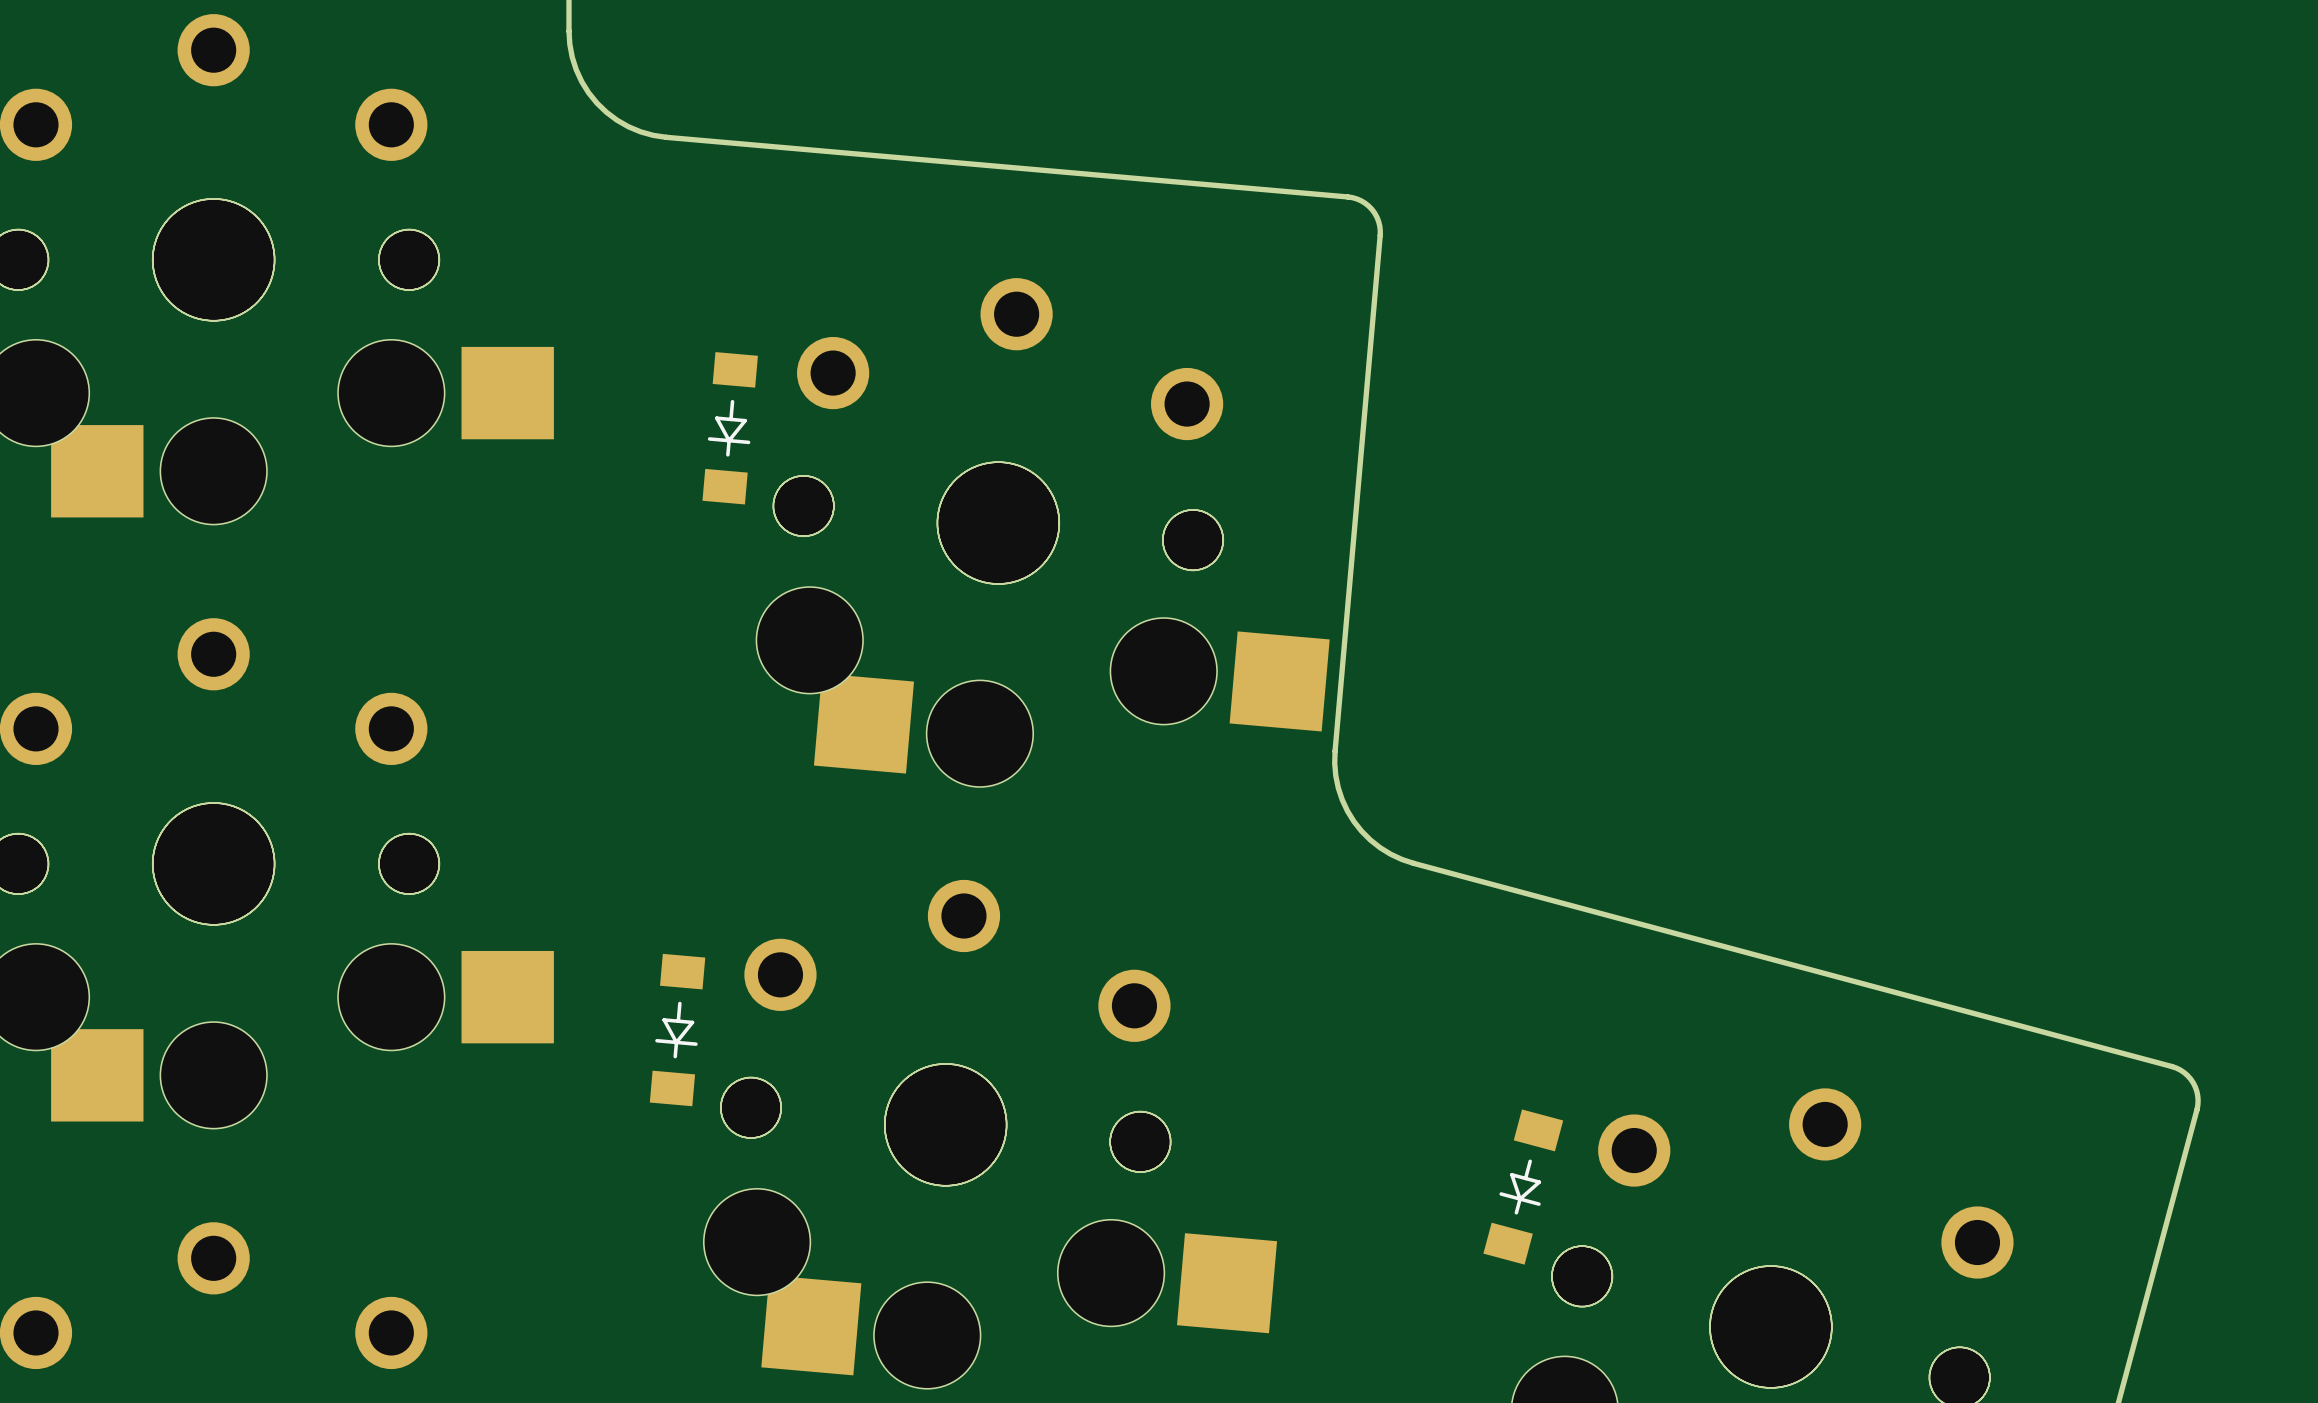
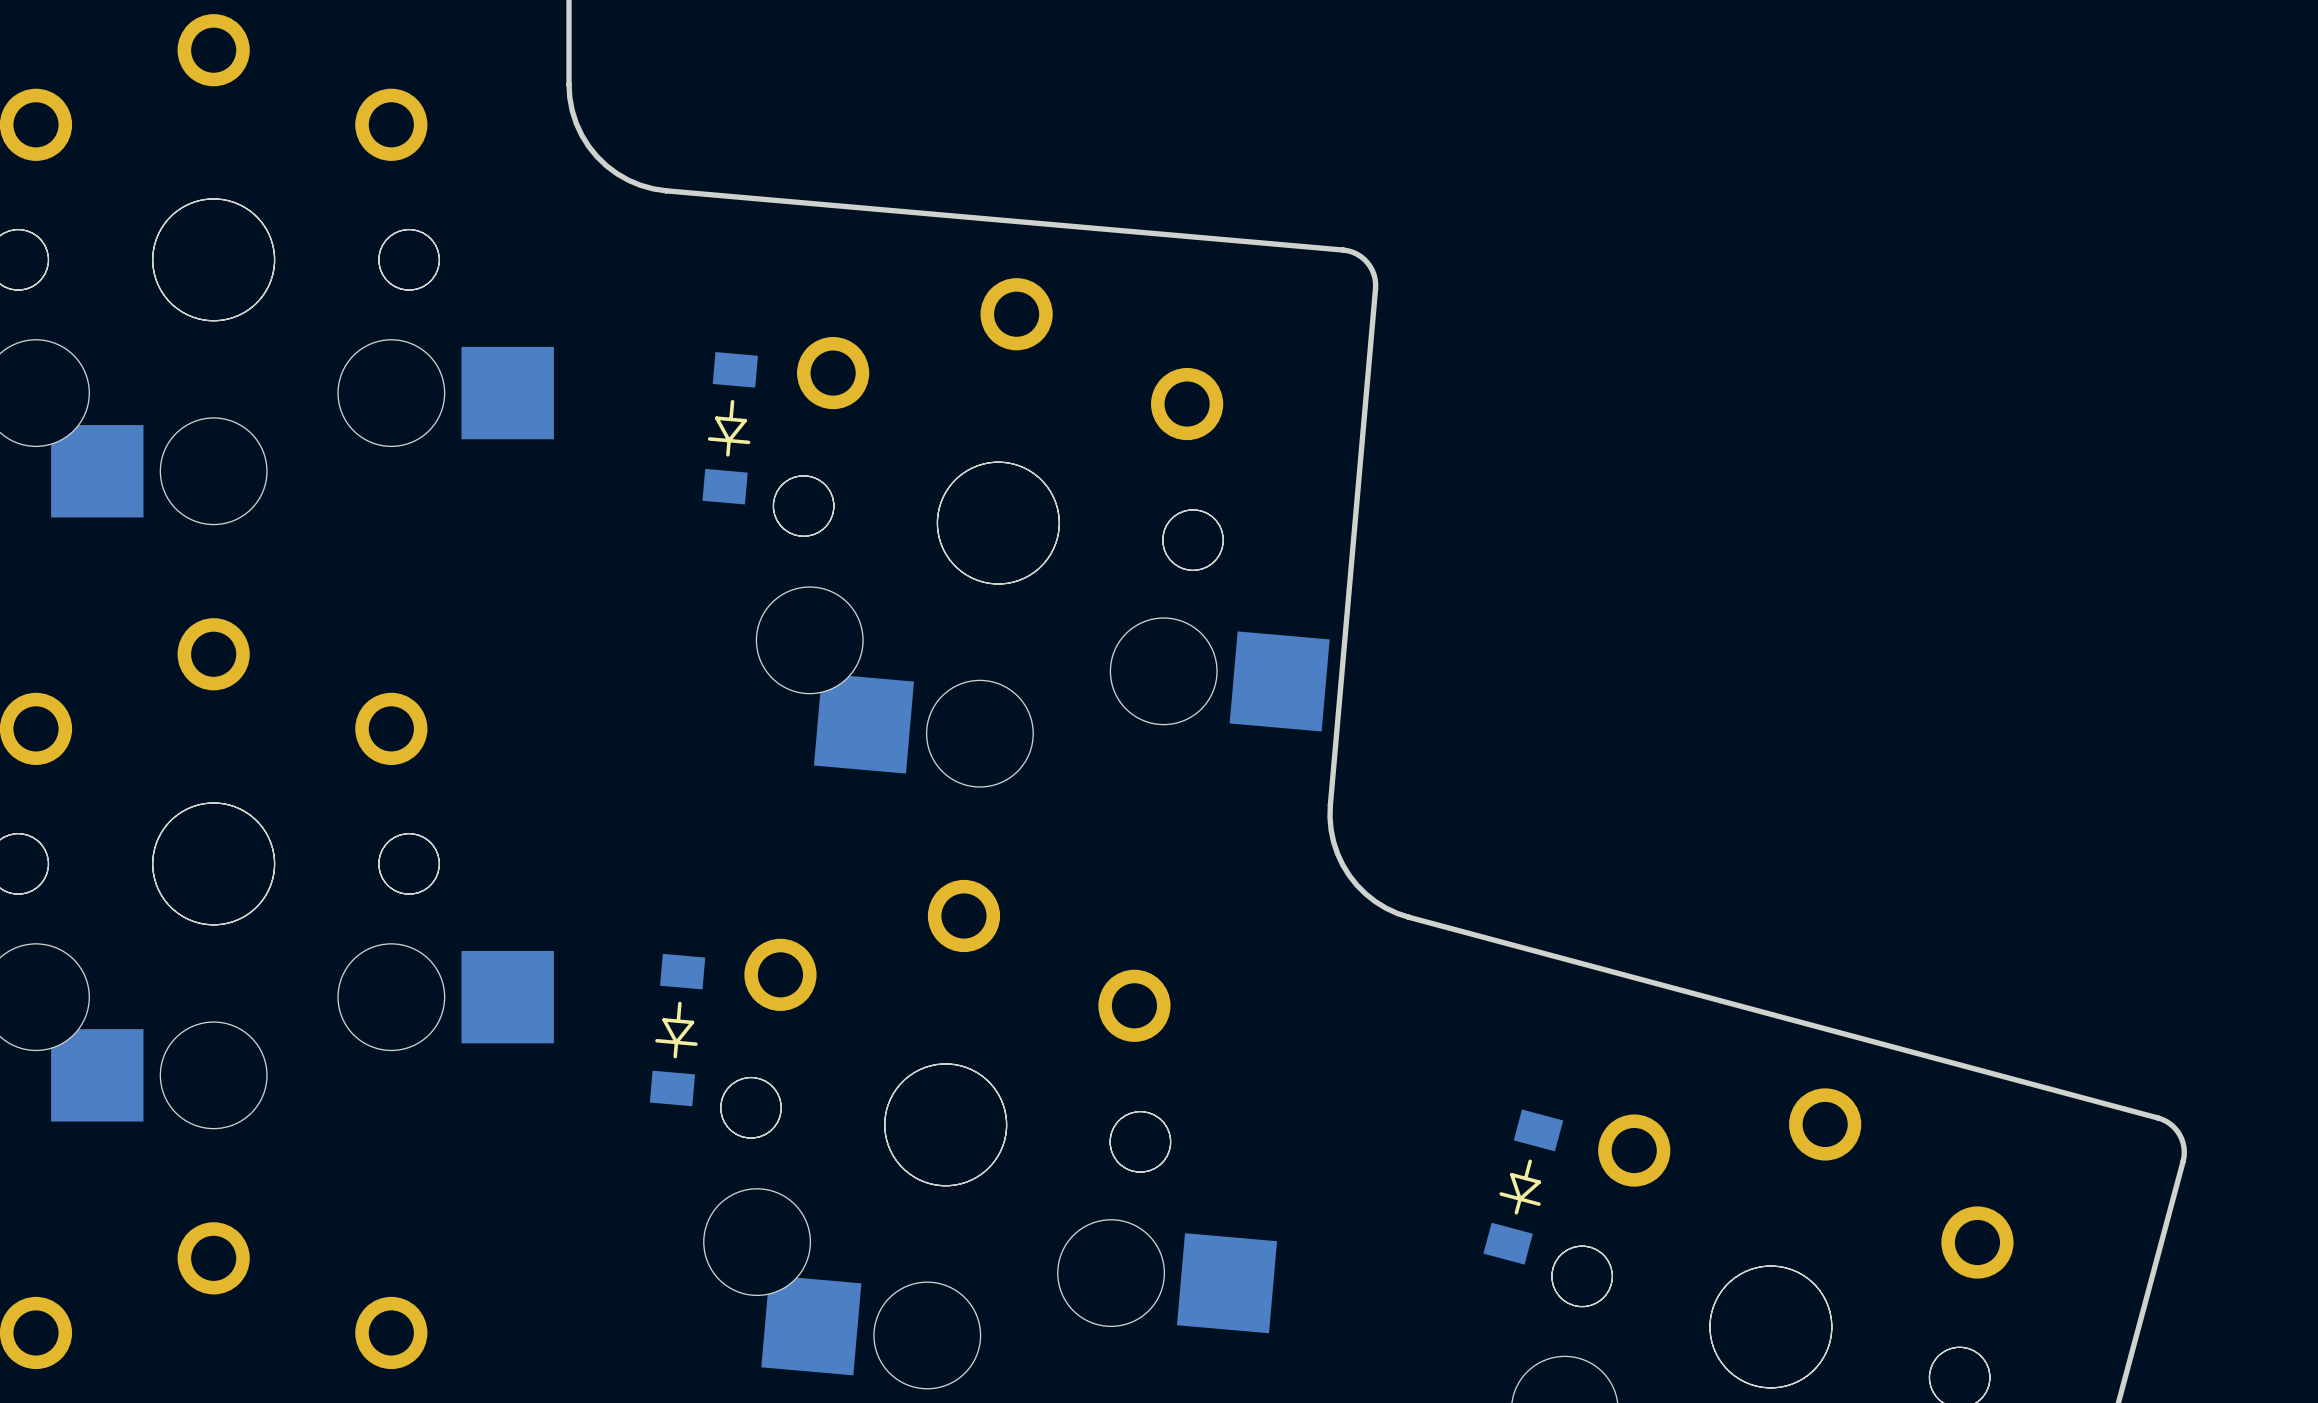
board edge: (569, 31) (569, 44) (576, 69) (588, 92) (597, 103) (617, 120) (640, 131) (653, 135) (1356, 198) (1372, 209) (1379, 226) (1375, 288) -> (569, 31) (569, 97) (576, 123) (581, 135) (588, 146) (606, 165) (628, 180) (640, 185) (666, 190) (1343, 250) (1356, 253) (1367, 262) (1374, 274) (1375, 288)
board edge: (1335, 751) (1338, 787) (1353, 821) (1380, 847) (1401, 859) (2176, 1067) (2190, 1079) (2197, 1096) (2196, 1110) (2183, 1161) -> (1335, 751) (1330, 817) (1333, 841) (1342, 864) (1356, 885) (1385, 908) (1408, 917) (2157, 1117) (2170, 1124) (2179, 1134) (2184, 1147) (2183, 1161)

